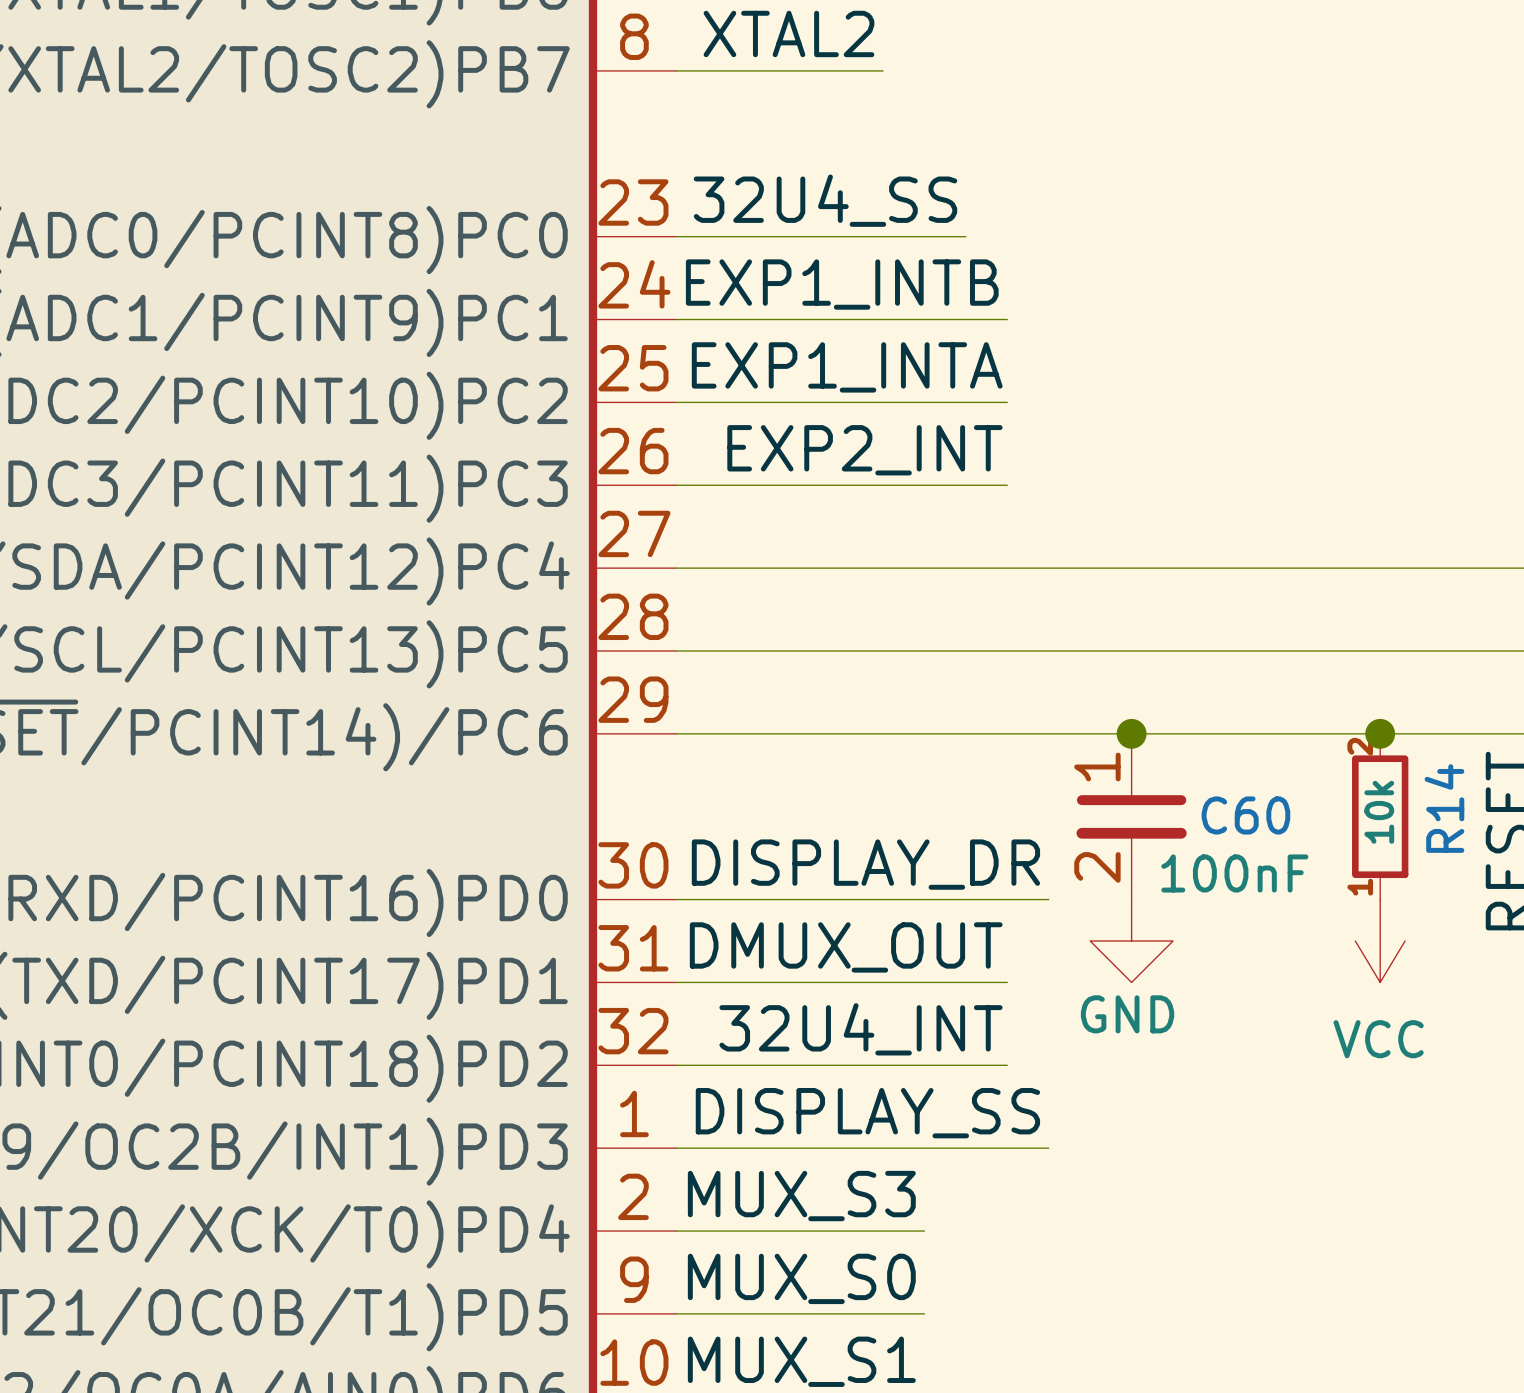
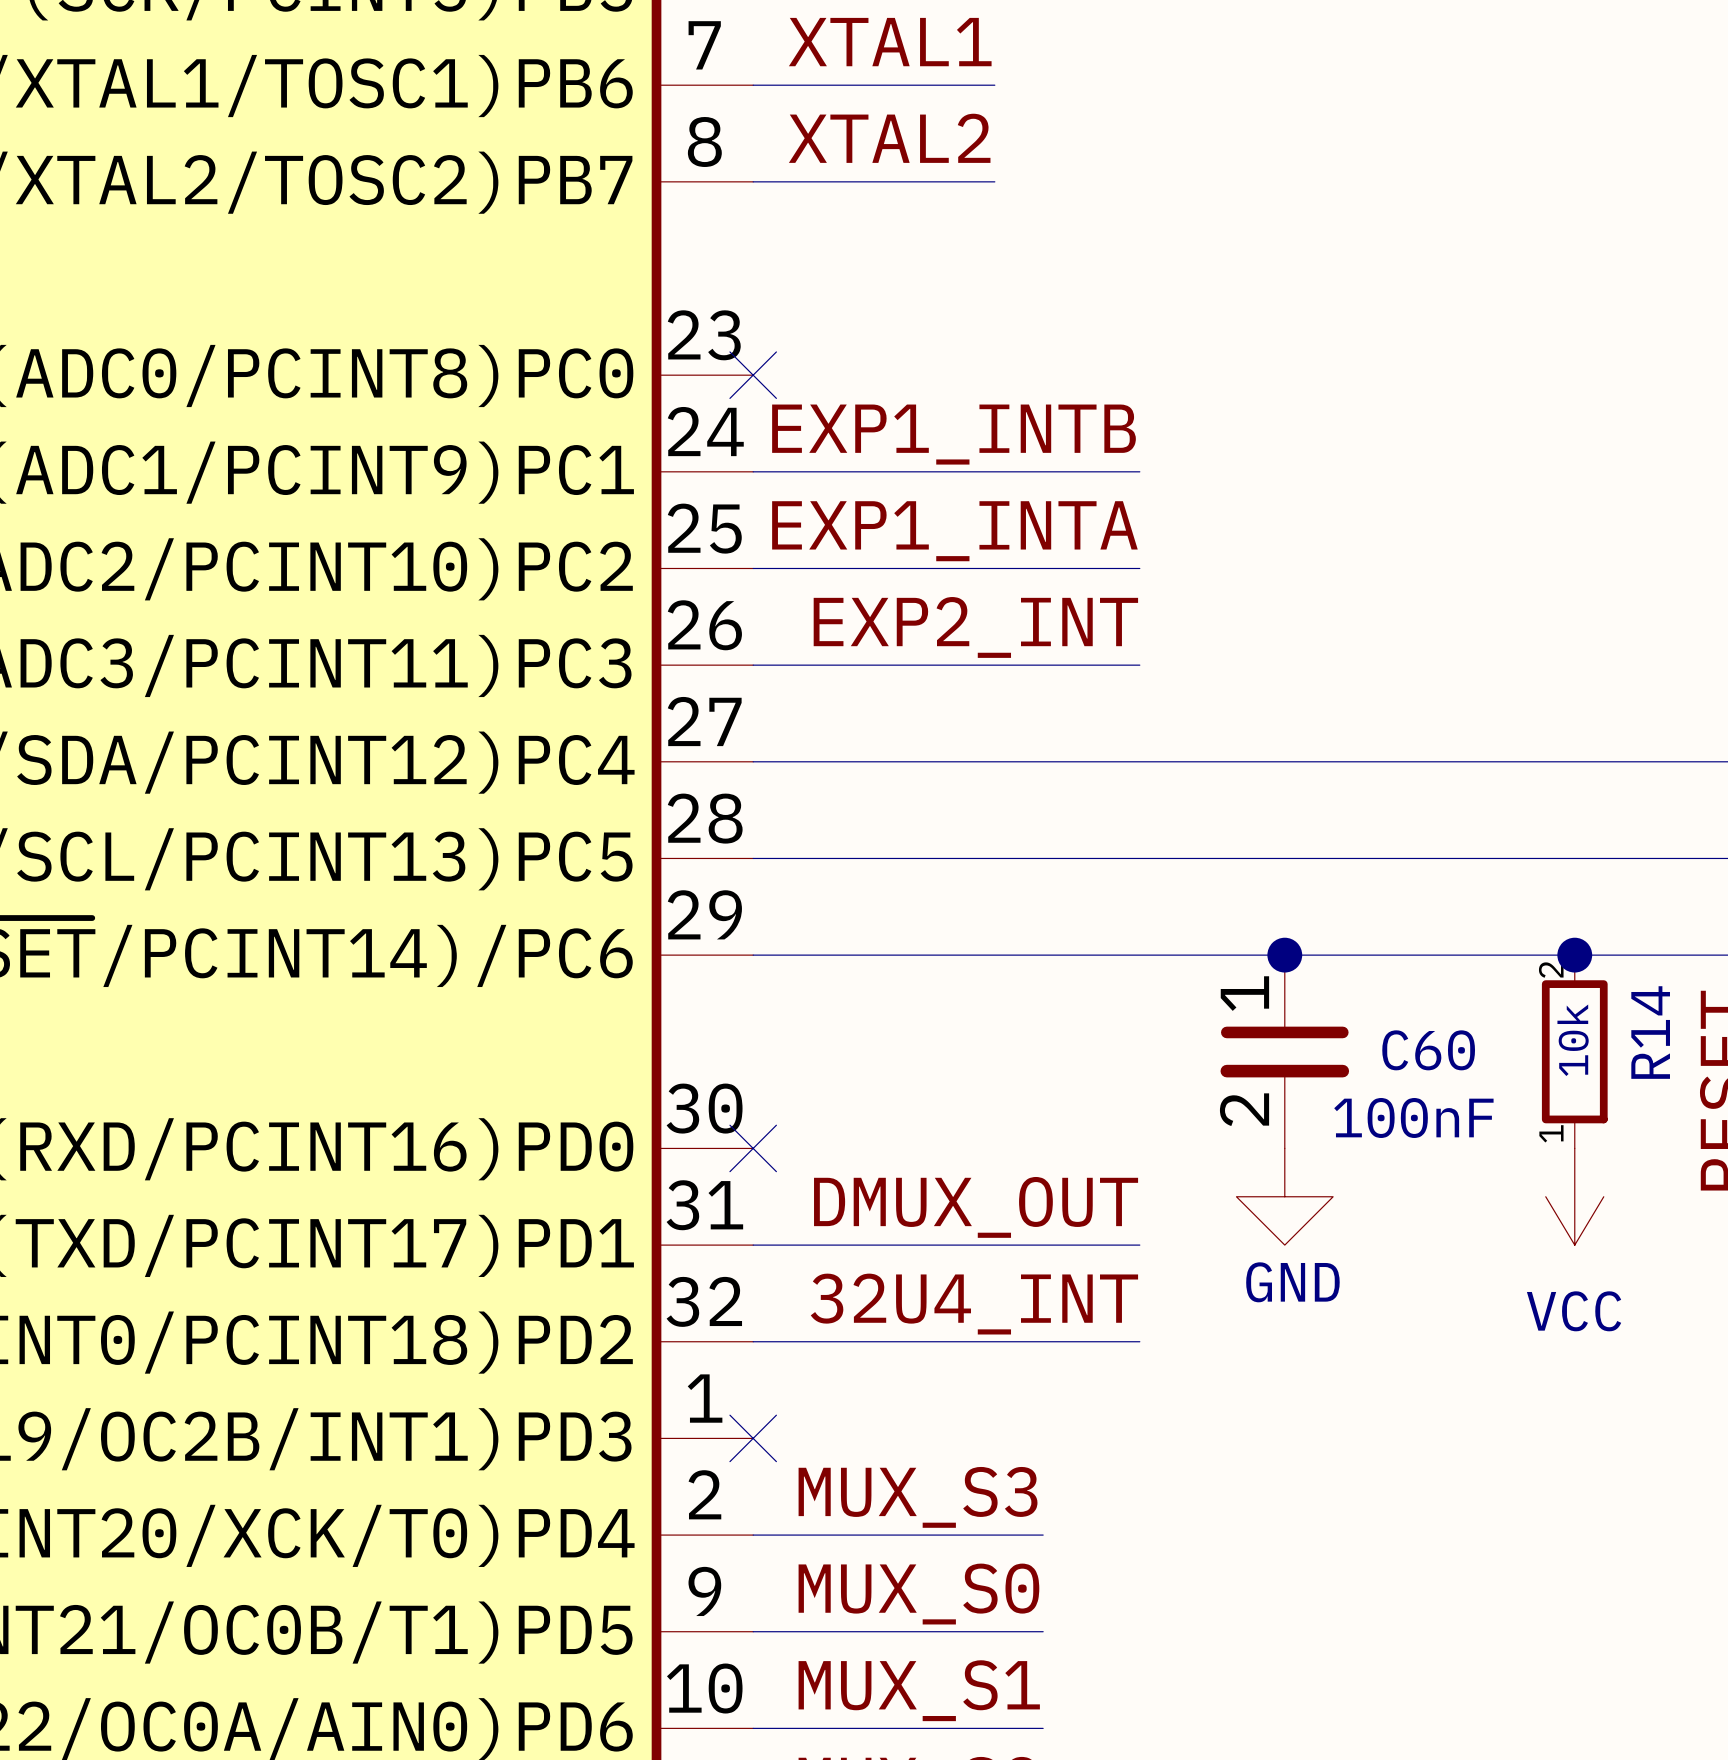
label: 32U4_SS (825, 200) -> none
wire: (675, 236) (965, 236) -> none
no-connect mark: none -> (753, 375)
label: DISPLAY_DR (865, 864) -> none
wire: (675, 899) (1048, 899) -> none
no-connect mark: none -> (753, 1148)
label: DISPLAY_SS (867, 1113) -> none
wire: (675, 1148) (1048, 1148) -> none
no-connect mark: none -> (753, 1438)

